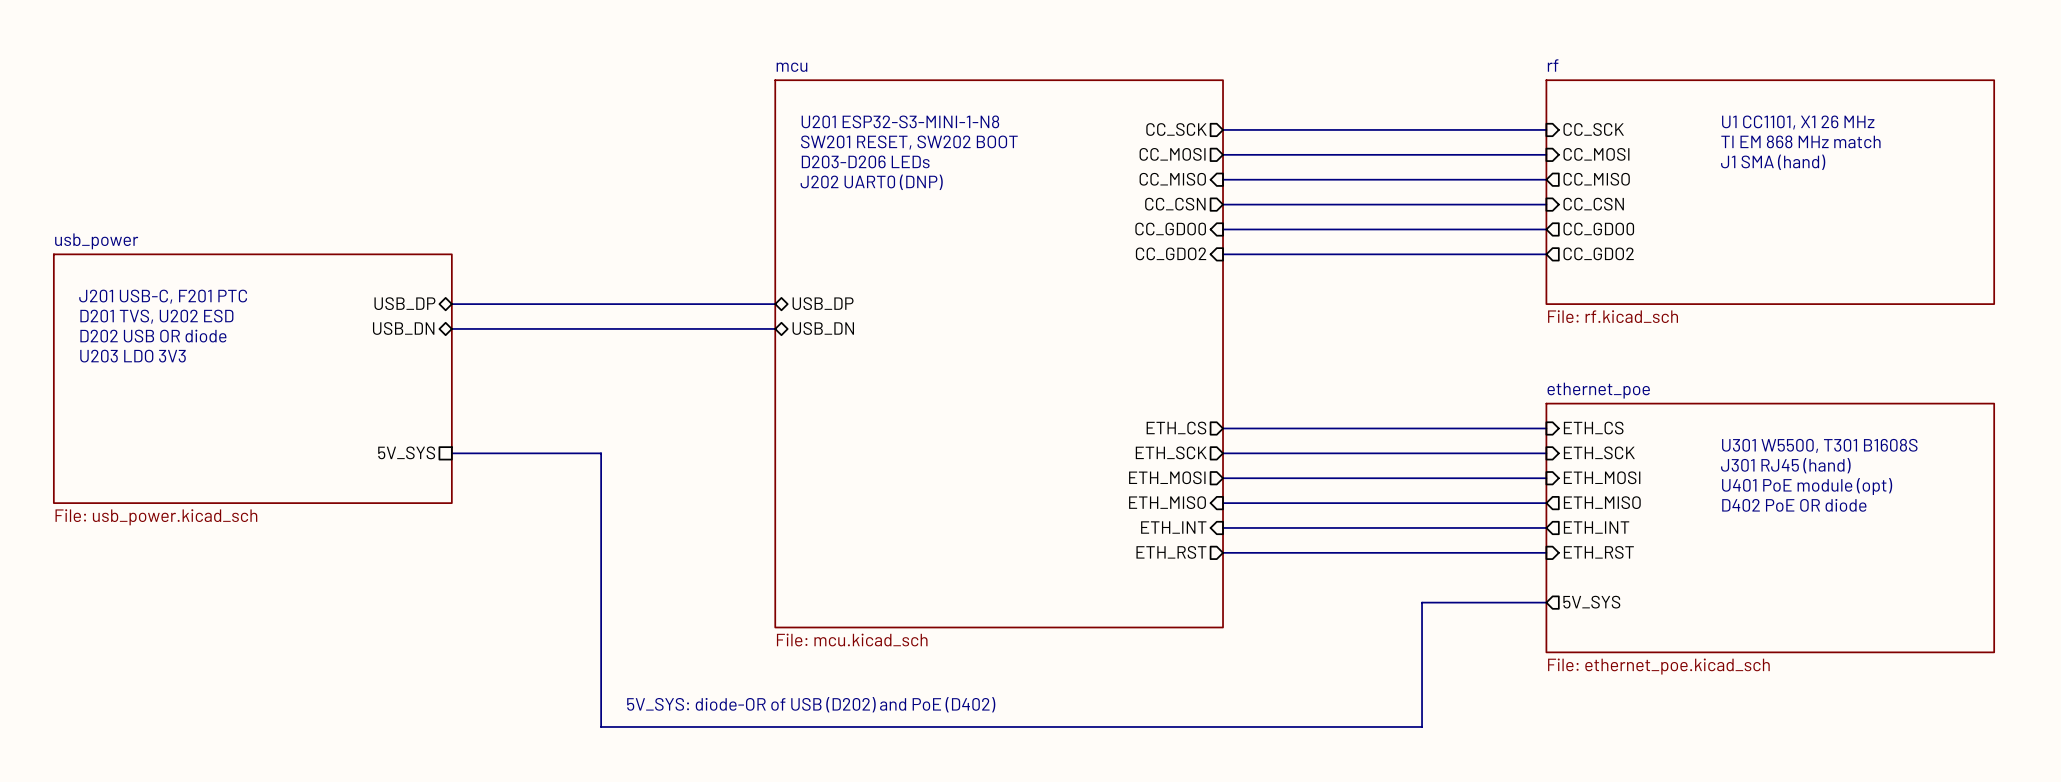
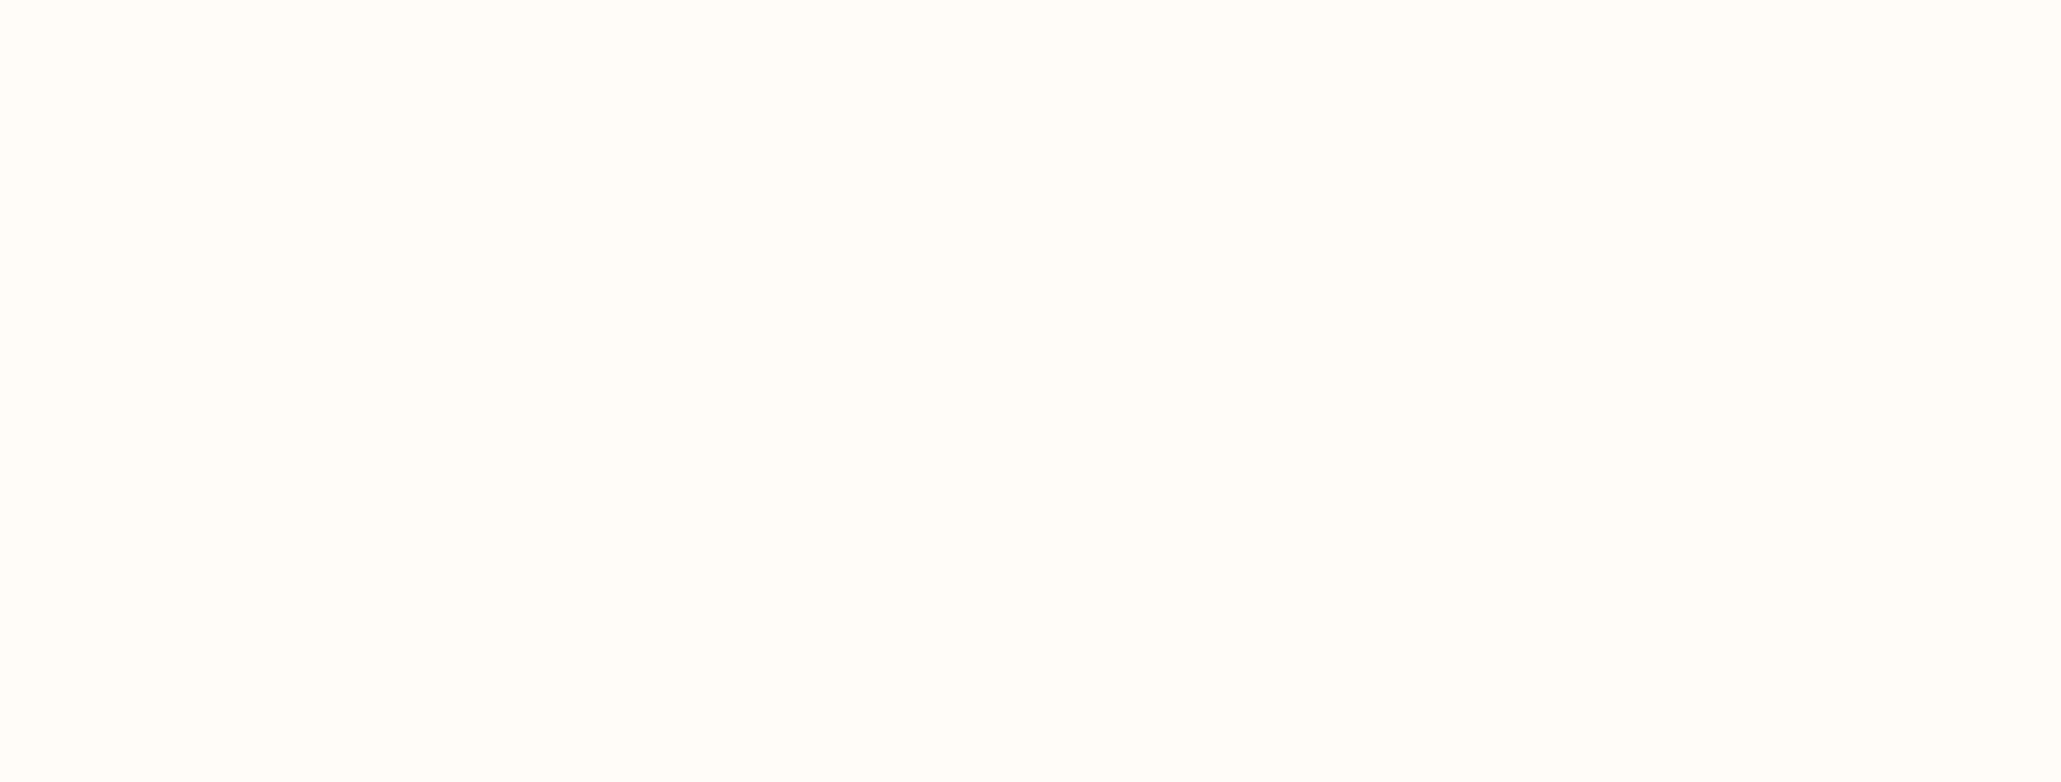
text: U201 ESP32-S3-MINI-1-N8 (900, 121) -> none
text: U1 CC1101, X1 26 MHz (1798, 122) -> none
sheet pin: CC_SCK (1176, 129) -> none
wire: (1223, 129) (1546, 129) -> none
sheet pin: CC_SCK (1593, 129) -> none
text: TI EM 868 MHz match (1800, 141) -> none
text: SW201 RESET, SW202 BOOT (909, 142) -> none
sheet pin: CC_MOSI (1172, 154) -> none
wire: (1223, 154) (1546, 154) -> none
sheet pin: CC_MOSI (1596, 154) -> none
text: D203-D206 LEDs (865, 161) -> none
text: J1 SMA (hand) (1773, 162) -> none
sheet pin: CC_MISO (1172, 179) -> none
wire: (1223, 179) (1546, 179) -> none
sheet pin: CC_MISO (1596, 179) -> none
text: J202 UART0 (DNP) (871, 182) -> none
sheet rf: File: rf.kicad_sch (1770, 192) -> none
sheet pin: CC_CSN (1175, 204) -> none
wire: (1223, 204) (1546, 204) -> none
sheet pin: CC_CSN (1593, 204) -> none
sheet pin: CC_GDO0 (1170, 229) -> none
wire: (1223, 229) (1546, 229) -> none
sheet pin: CC_GDO0 (1598, 229) -> none
sheet pin: CC_GDO2 (1171, 253) -> none
sheet pin: CC_GDO2 (1598, 253) -> none
wire: (1223, 254) (1546, 254) -> none
text: J201 USB-C, F201 PTC (163, 296) -> none
sheet pin: USB_DP (404, 303) -> none
sheet pin: USB_DP (823, 303) -> none
wire: (451, 304) (775, 304) -> none
text: D201 TVS, U202 ESD (156, 316) -> none
sheet pin: USB_DN (403, 328) -> none
wire: (451, 328) (775, 328) -> none
sheet pin: USB_DN (823, 328) -> none
text: D202 USB OR diode (153, 336) -> none
sheet mcu: File: mcu.kicad_sch (999, 353) -> none
text: U203 LDO 3V3 (133, 356) -> none
sheet usb_power: File: usb_power.kicad_sch (252, 378) -> none
sheet pin: ETH_CS (1176, 428) -> none
wire: (1223, 428) (1546, 428) -> none
sheet pin: ETH_CS (1593, 428) -> none
text: U301 W5500, T301 B1608S (1819, 445) -> none
sheet pin: 5V_SYS (406, 452) -> none
sheet pin: ETH_SCK (1171, 452) -> none
sheet pin: ETH_SCK (1599, 452) -> none
wire: (451, 453) (601, 453) (601, 726) (1422, 726) (1422, 602) (1546, 602) -> none
wire: (1223, 453) (1546, 453) -> none
text: J301 RJ45 (hand) (1785, 465) -> none
sheet pin: ETH_MOSI (1167, 477) -> none
sheet pin: ETH_MOSI (1602, 477) -> none
wire: (1223, 478) (1546, 478) -> none
text: U401 PoE module (opt) (1807, 486) -> none
sheet pin: ETH_MISO (1167, 502) -> none
sheet pin: ETH_MISO (1602, 502) -> none
wire: (1223, 503) (1546, 503) -> none
text: D402 PoE OR diode (1794, 505) -> none
sheet pin: ETH_INT (1173, 527) -> none
wire: (1223, 527) (1546, 527) -> none
sheet pin: ETH_INT (1596, 527) -> none
sheet ethernet_poe: File: ethernet_poe.kicad_sch (1770, 527) -> none
sheet pin: ETH_RST (1171, 552) -> none
wire: (1223, 552) (1546, 552) -> none
sheet pin: ETH_RST (1598, 552) -> none
sheet pin: 5V_SYS (1591, 602) -> none
text: 5V_SYS: diode-OR of USB (D202) and PoE (D402) (811, 704) -> none

